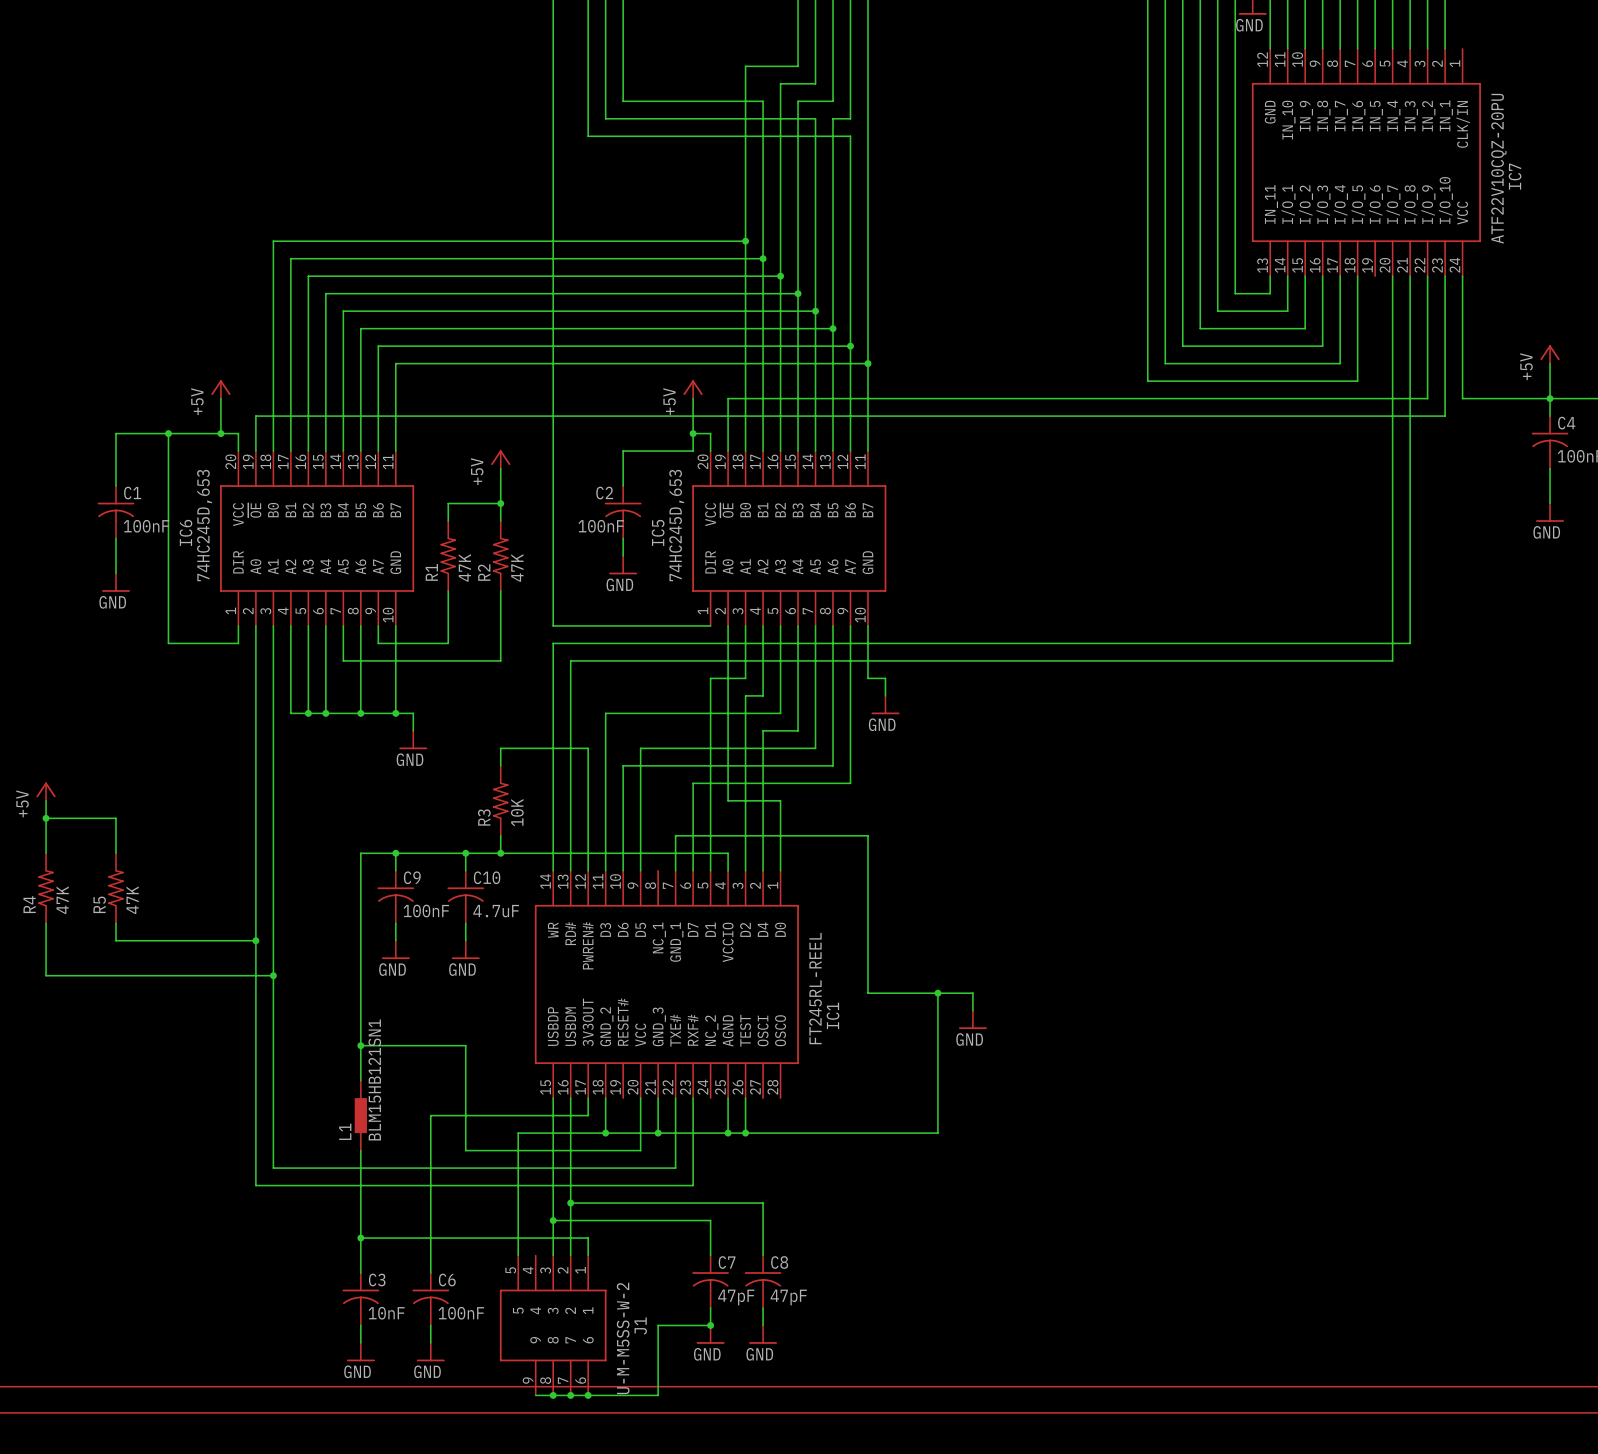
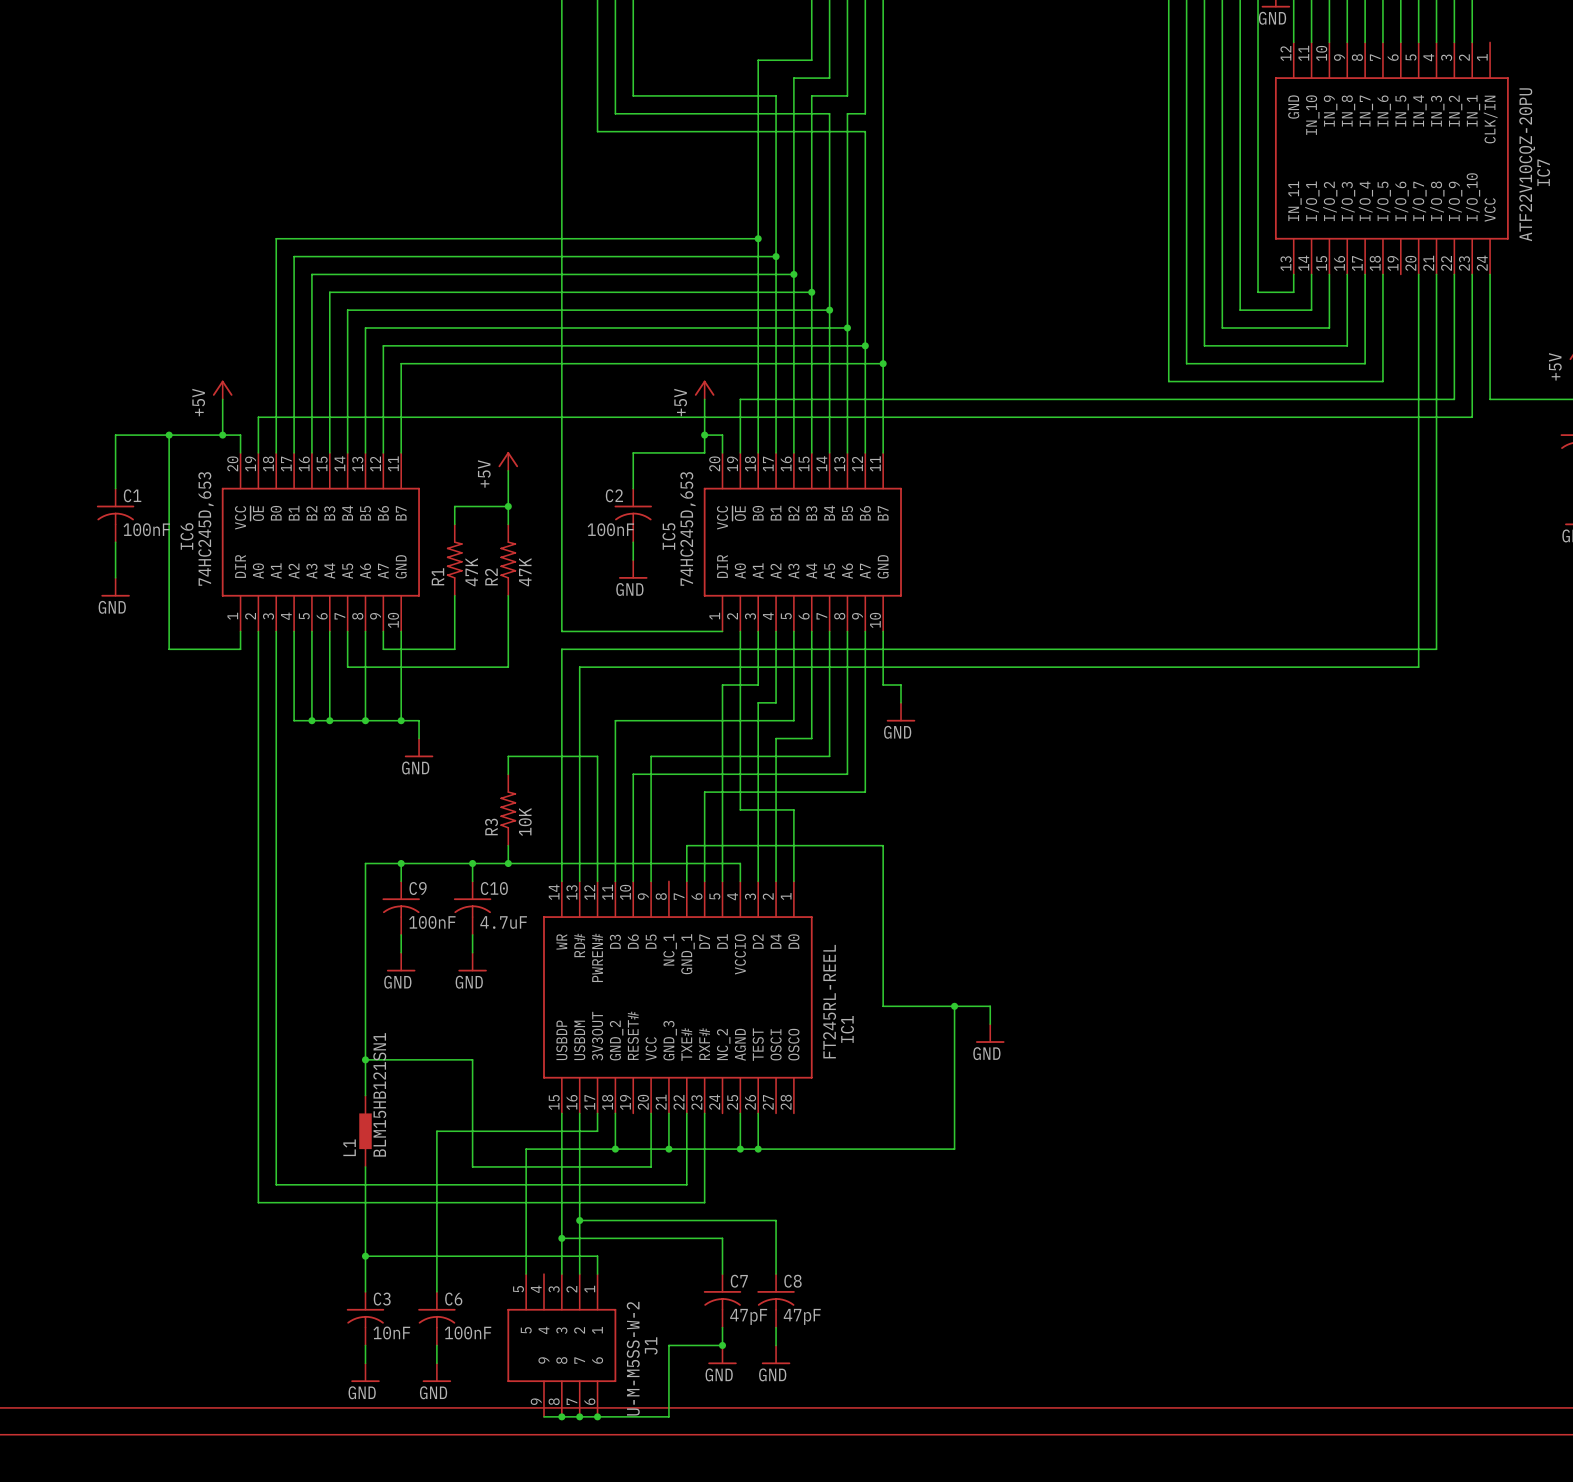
power symbol: +5V (46, 791) -> none
wire: (46, 800) (46, 853) -> none
wire: (46, 818) (115, 818) (115, 853) -> none
junction: (46, 818) -> none
R4: 47K (46, 888) -> none
R5: 47K (115, 888) -> none
wire: (46, 923) (46, 975) (273, 975) -> none
wire: (115, 923) (115, 940) (255, 940) -> none
junction: (255, 940) -> none
junction: (273, 975) -> none

